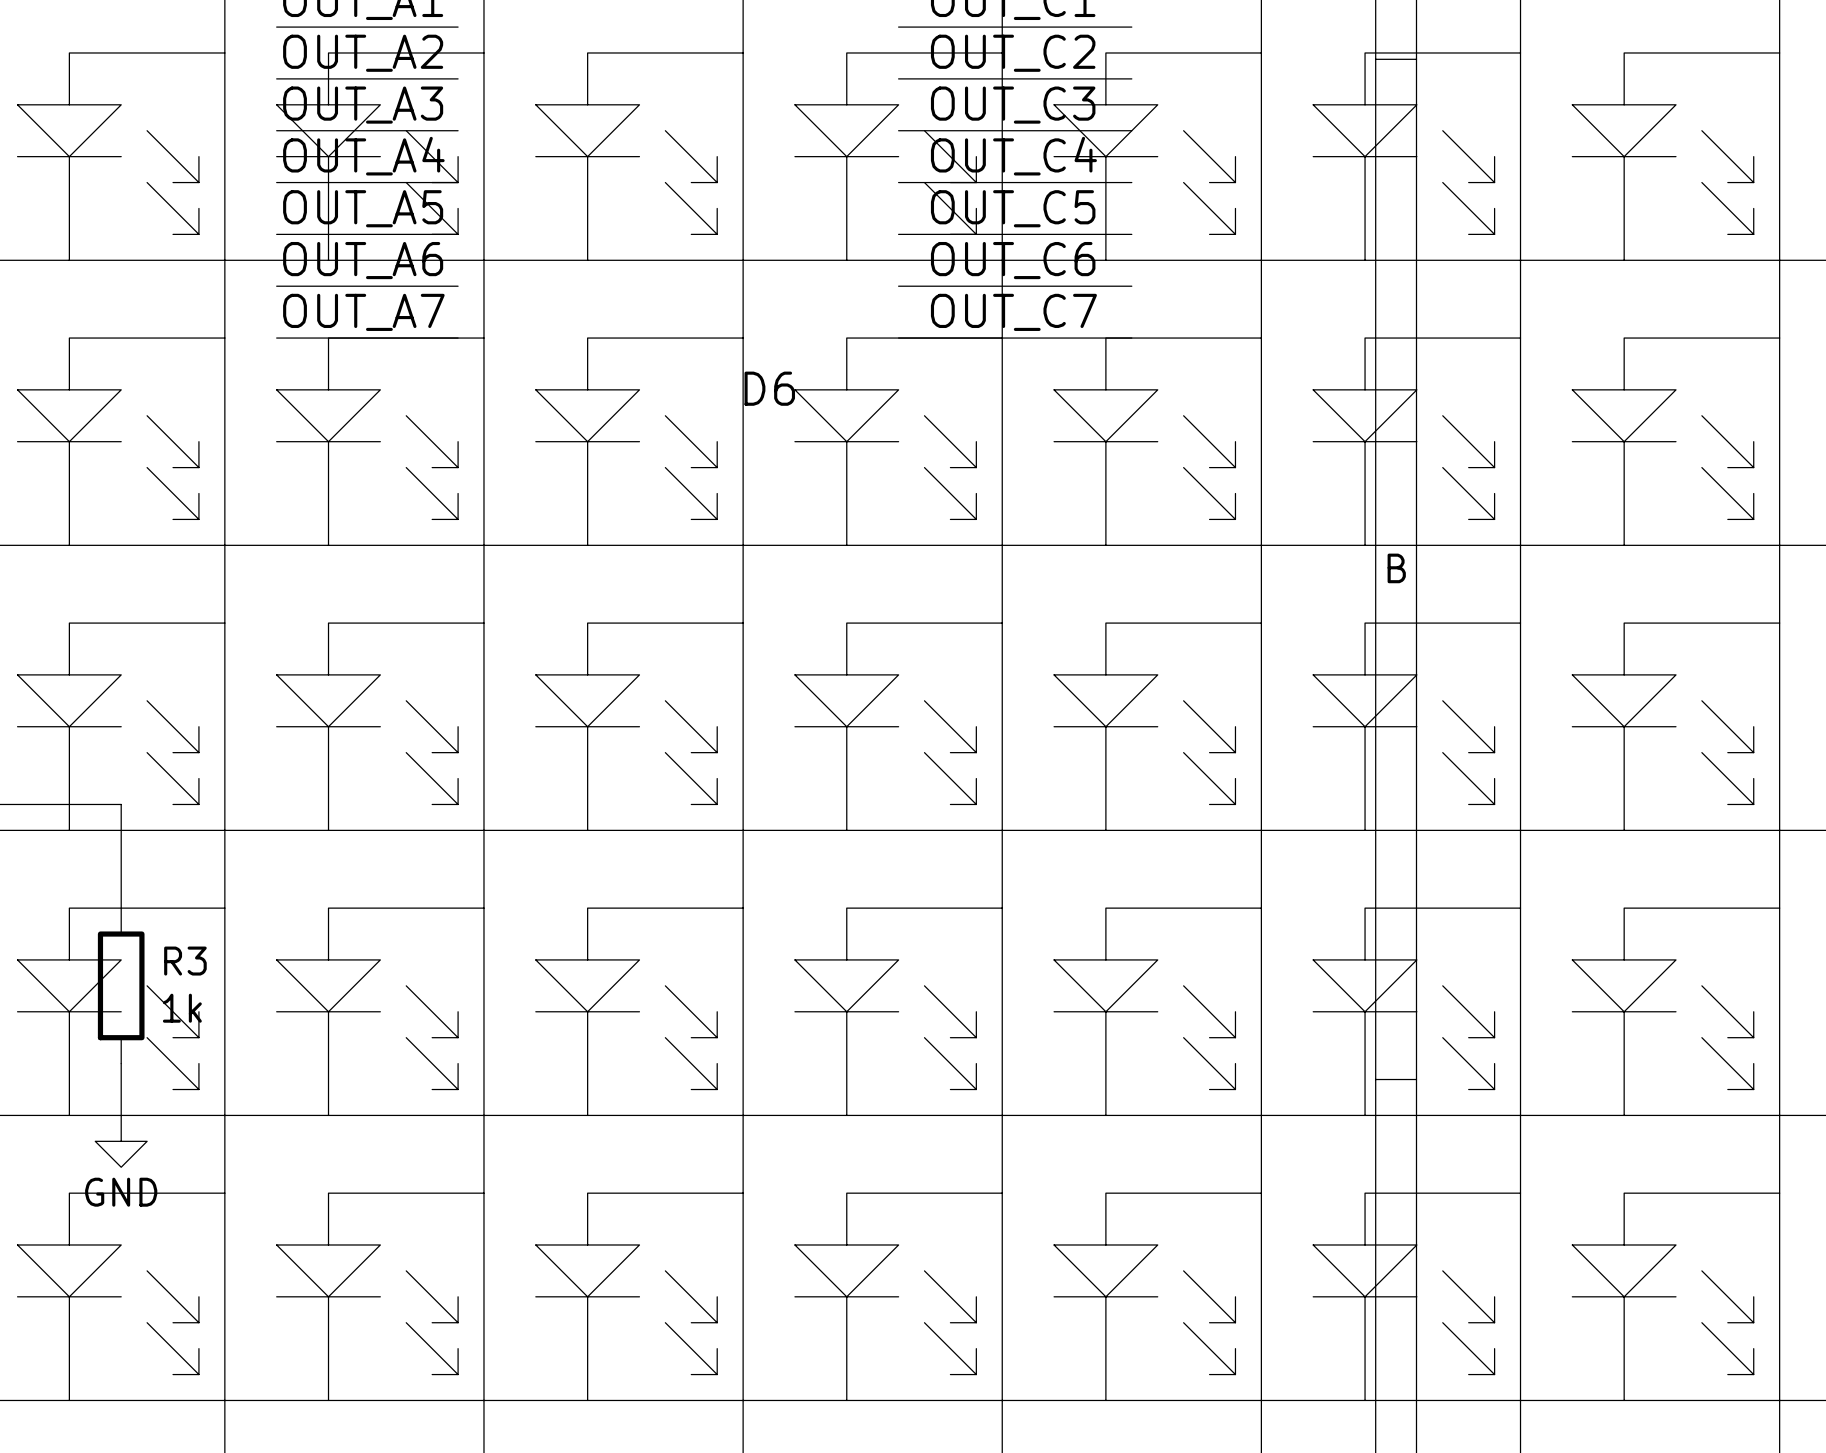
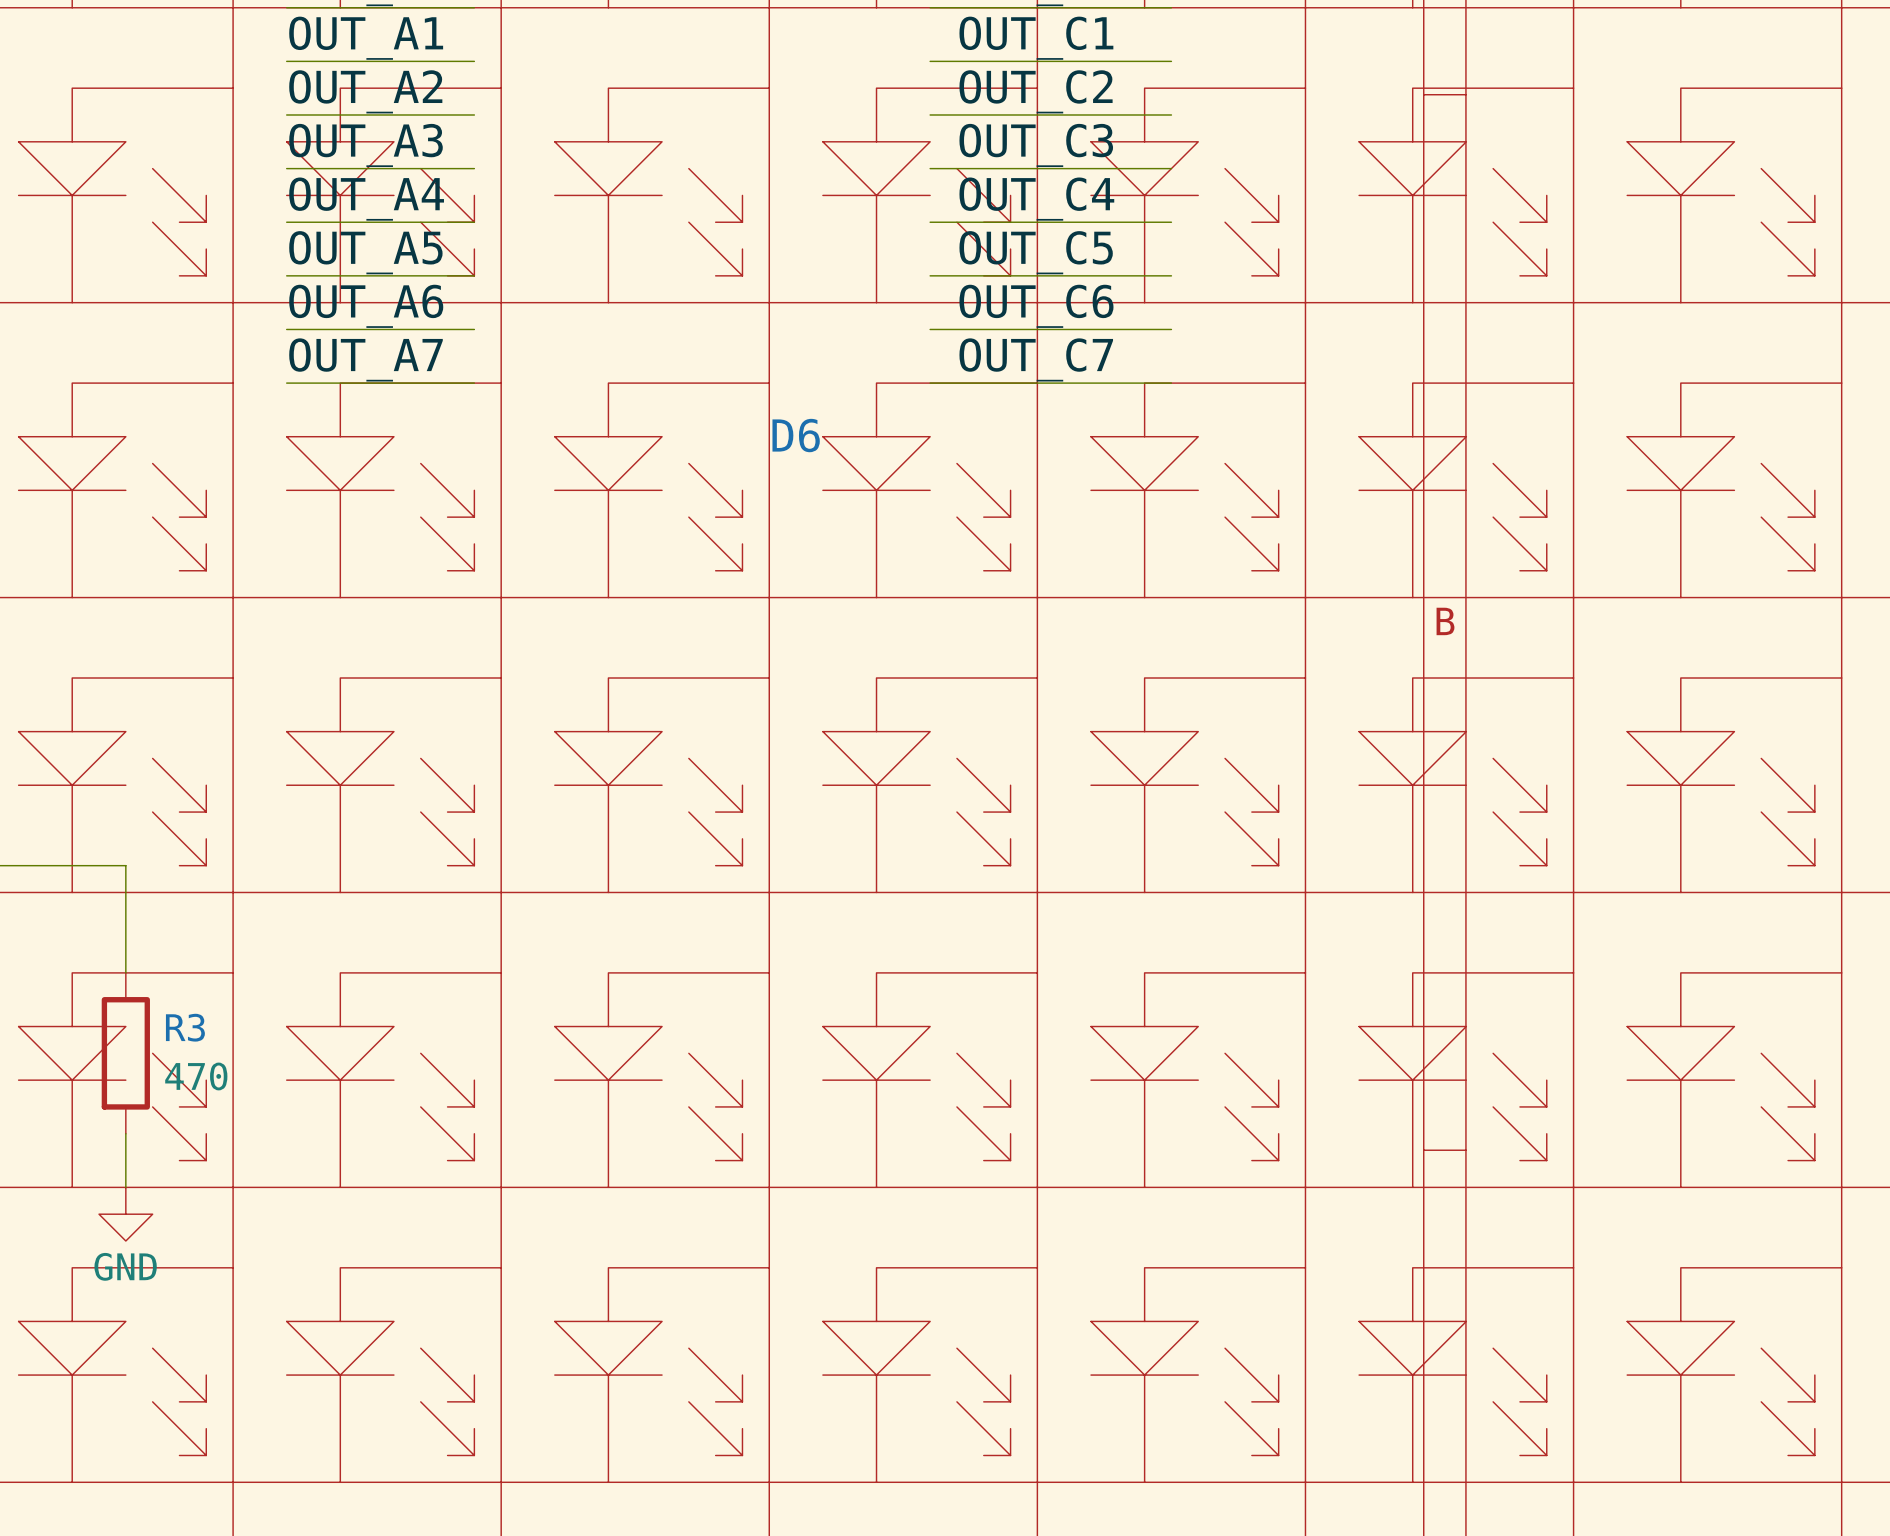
R3 value: 1k (182, 1008) -> 470 (196, 1076)

